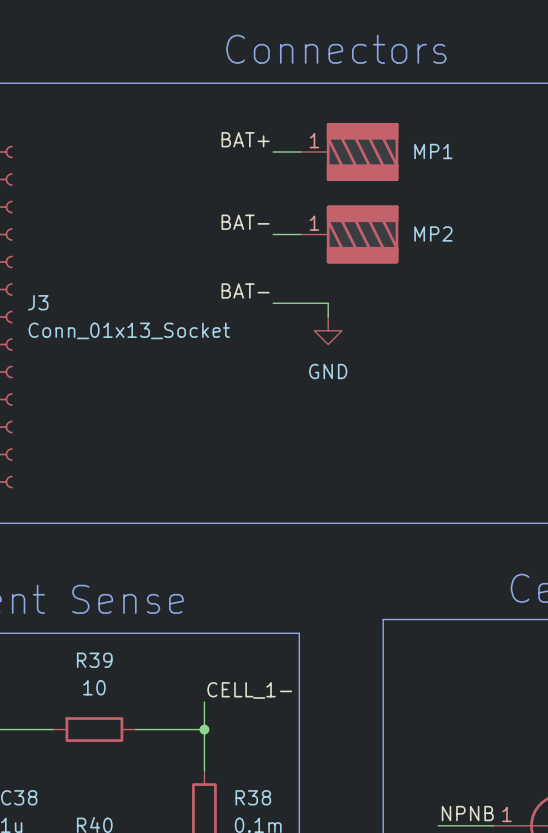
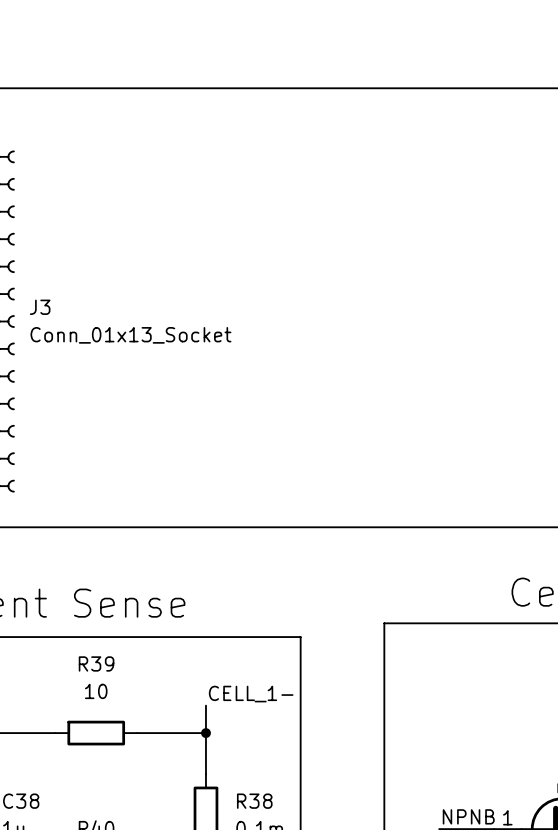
text: Connectors (336, 49) -> none
label: BAT+ (245, 139) -> none
wire: (273, 152) (300, 152) -> none
MP1: (349, 152) -> none
label: BAT- (245, 222) -> none
wire: (273, 234) (300, 234) -> none
MP2: (349, 234) -> none
label: BAT- (245, 290) -> none
wire: (273, 303) (328, 303) (328, 317) -> none
power symbol: GND (328, 330) -> none

